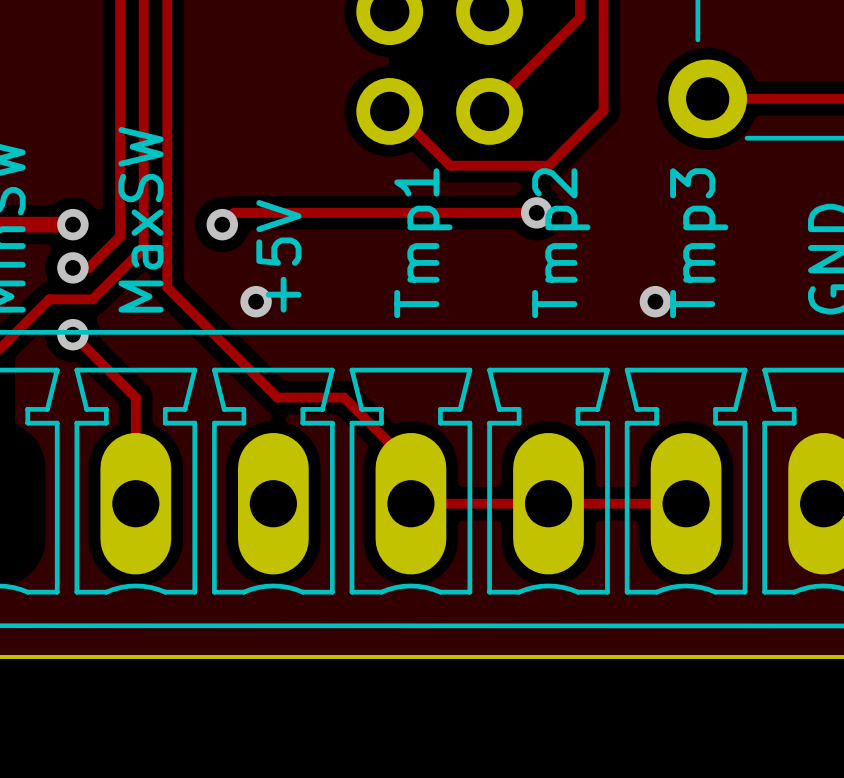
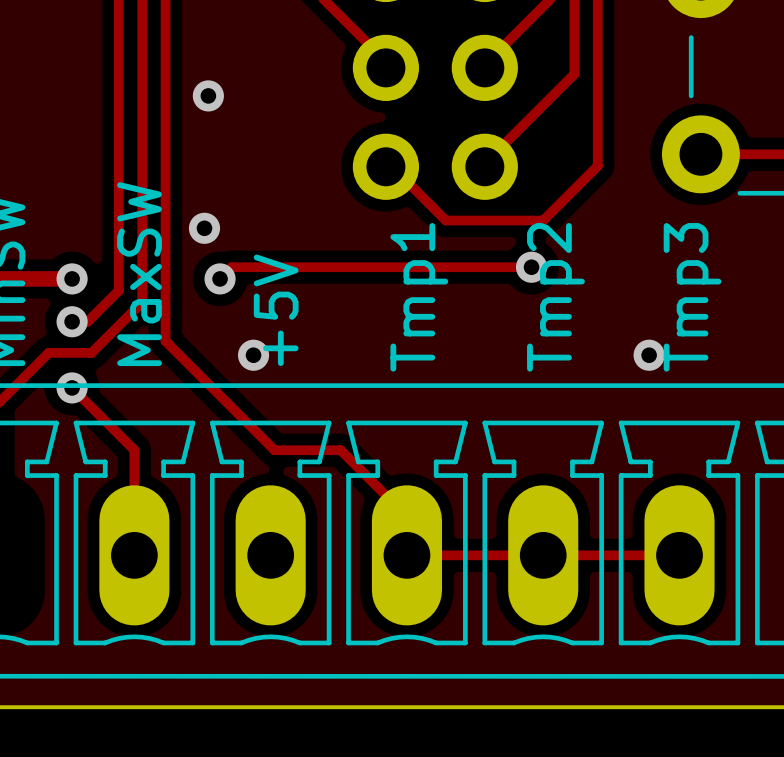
via: none -> (208, 95)
via: none -> (204, 228)

